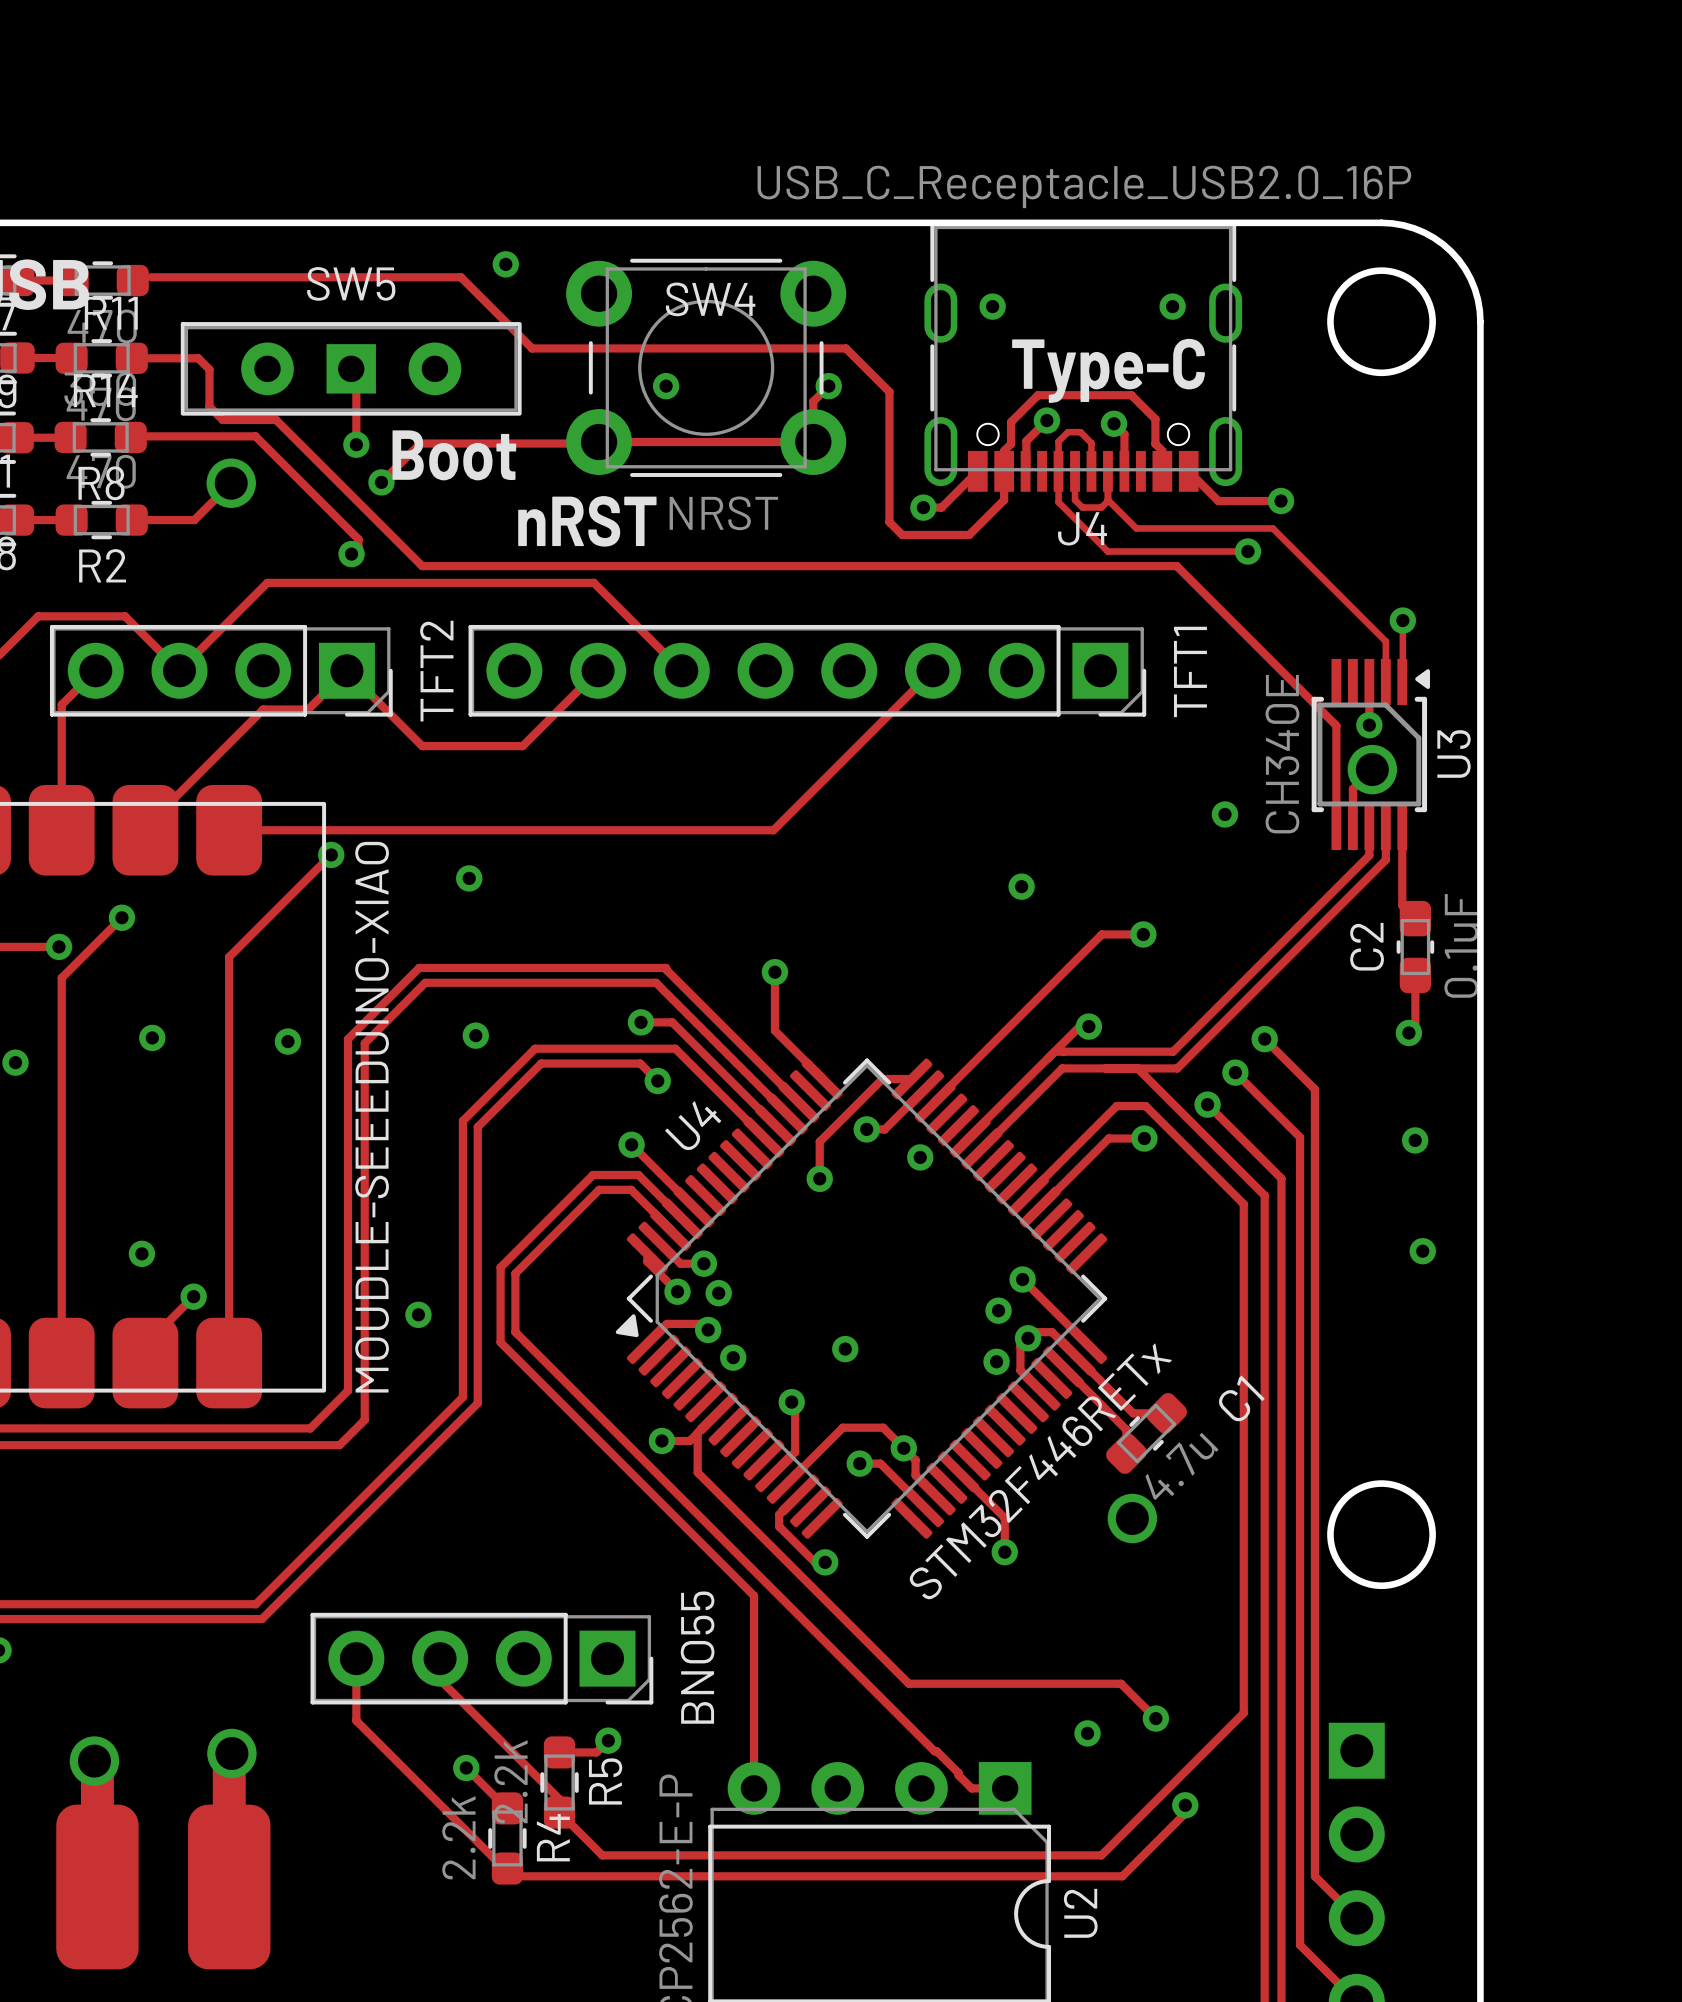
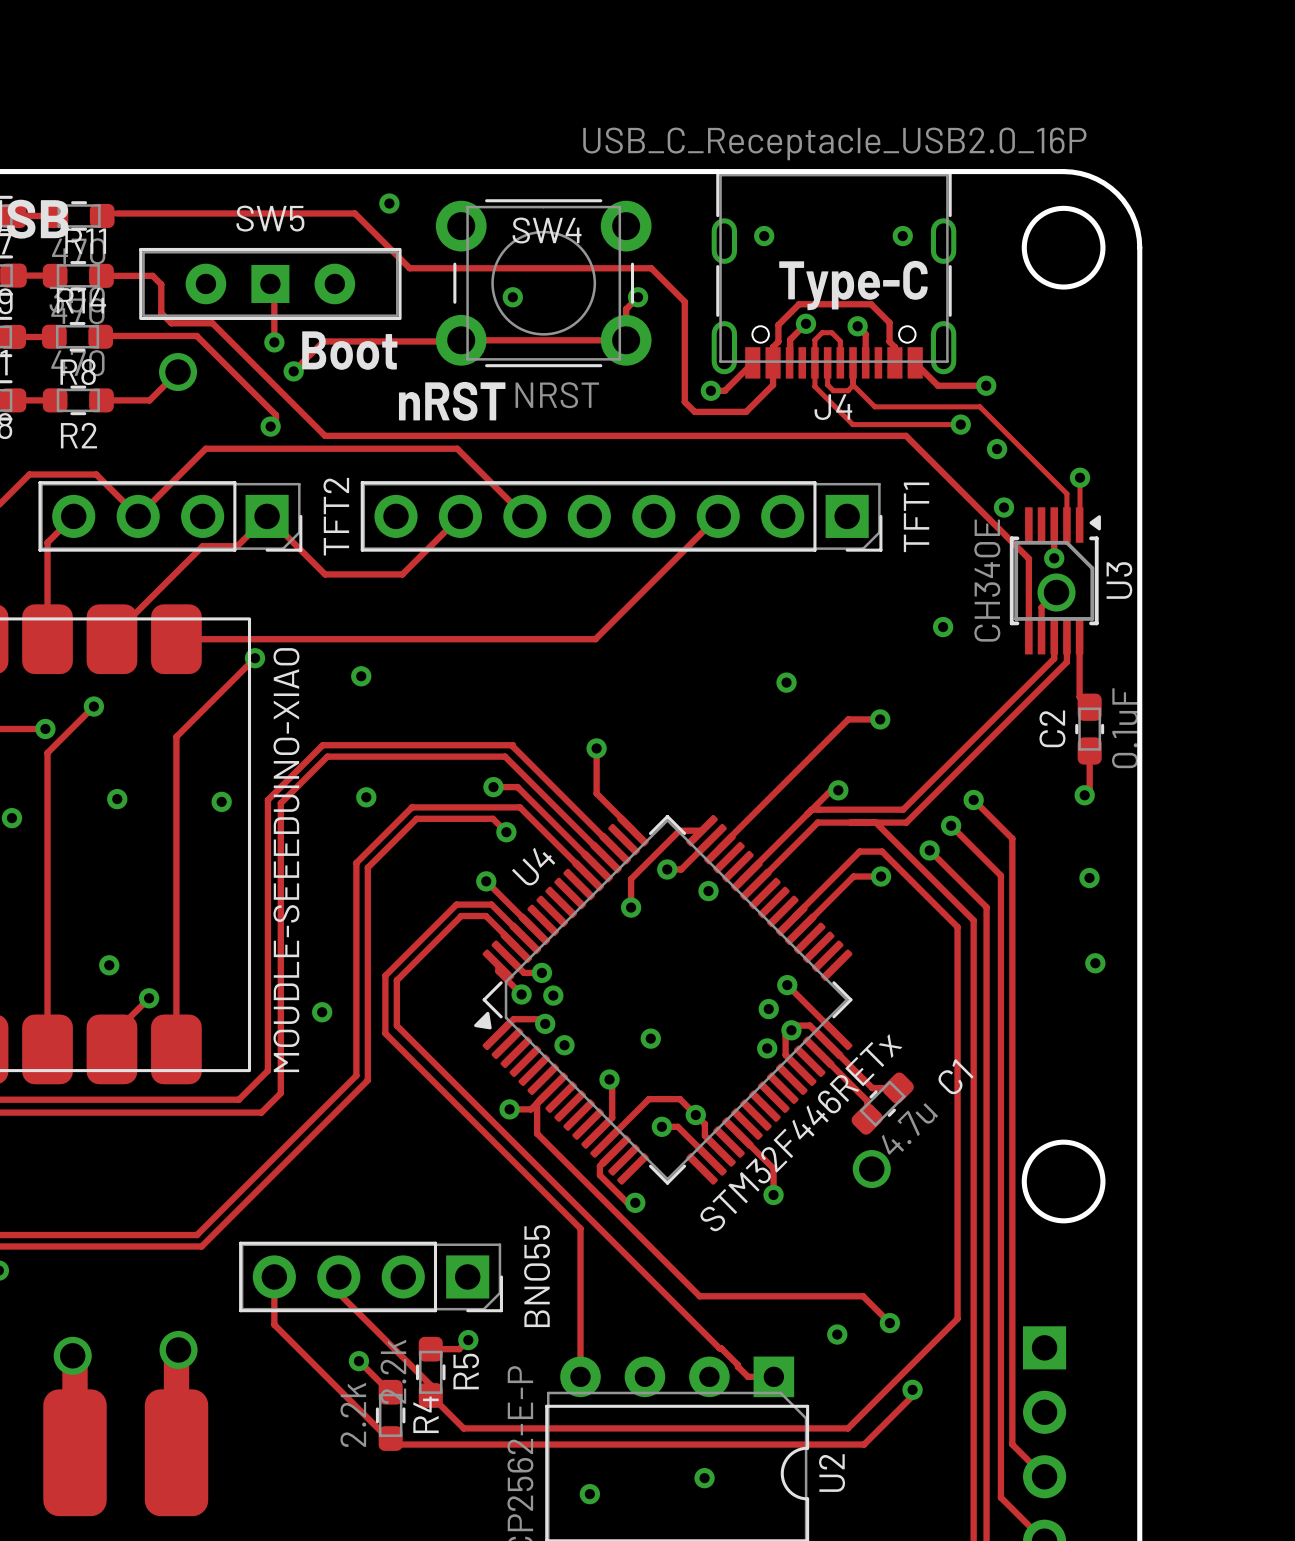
via: none -> (997, 449)
via: none -> (1003, 507)
via: none -> (704, 1478)
via: none -> (589, 1494)

